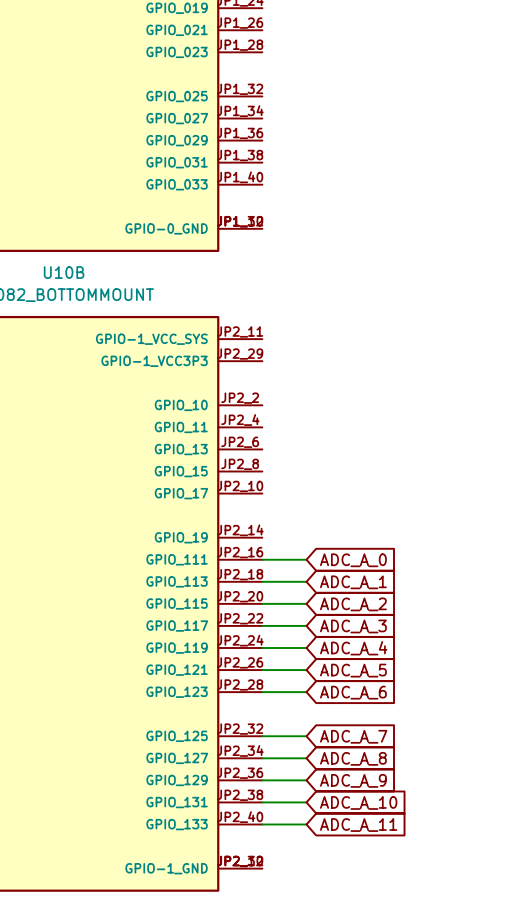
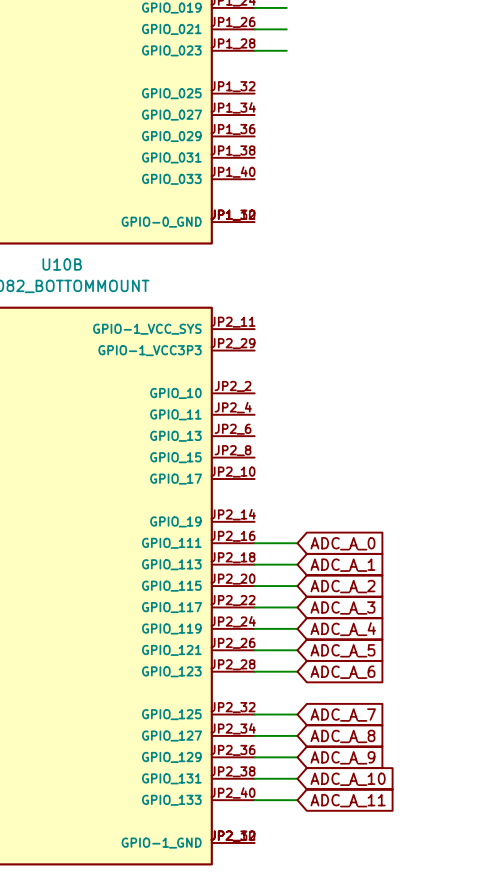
wire: none -> (254, 7) (286, 7)
wire: none -> (254, 29) (286, 29)
wire: none -> (254, 50) (286, 50)

